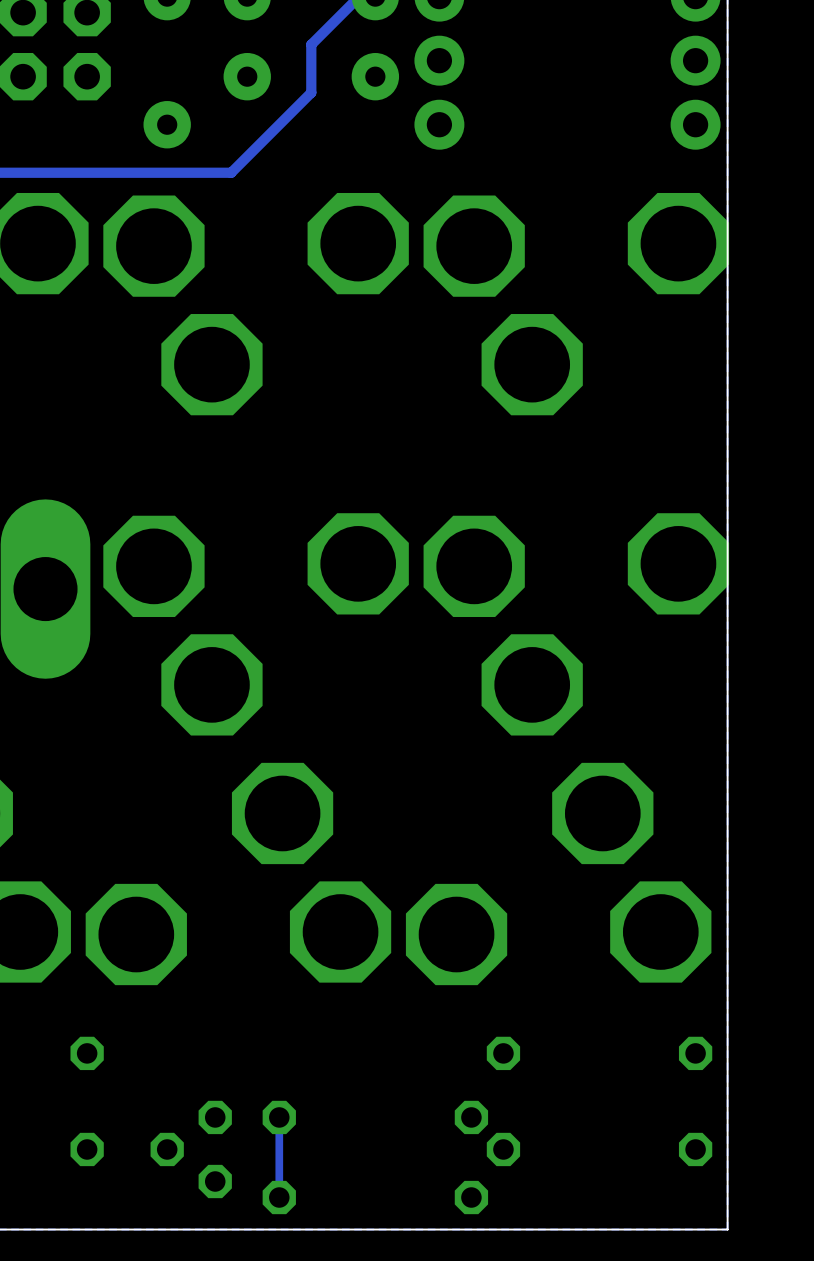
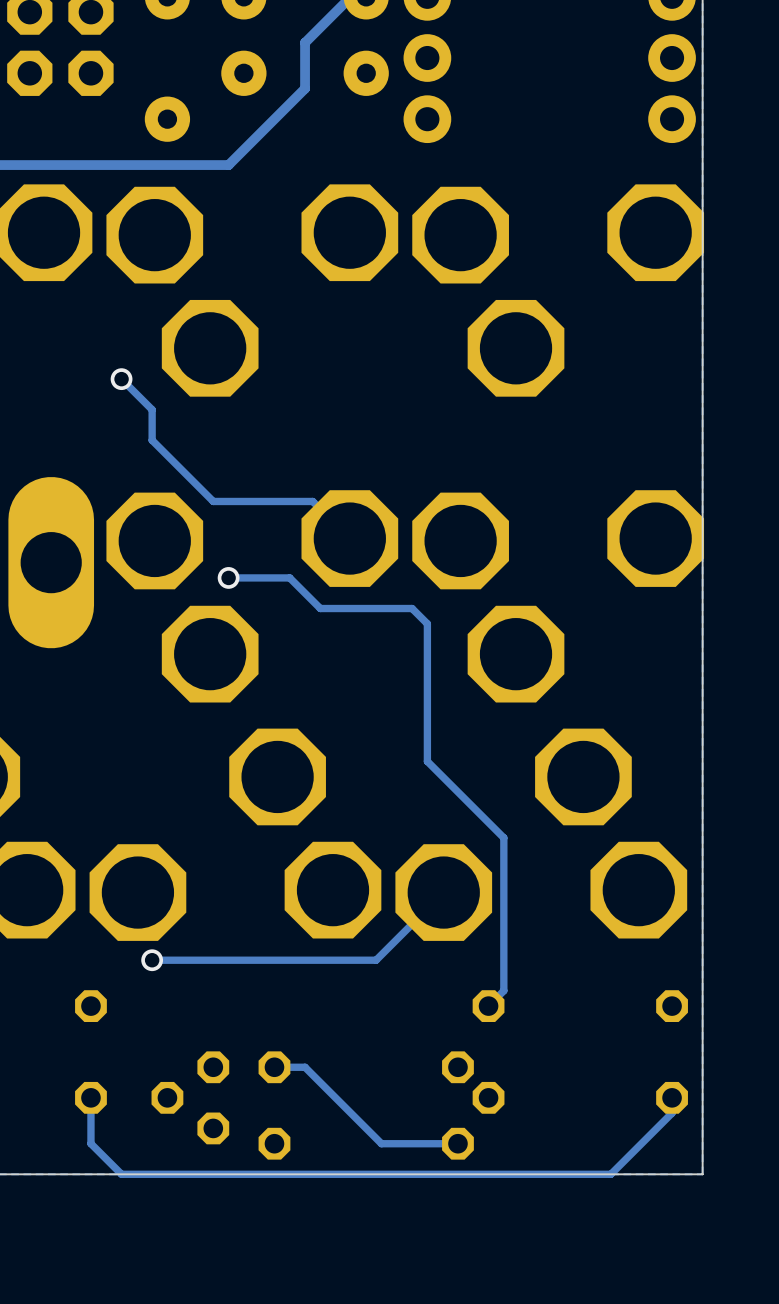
track: none -> (121, 379) (152, 409) (152, 440) (213, 501) (312, 501) (349, 538)
via: none -> (121, 379)
track: none -> (228, 577) (289, 577) (320, 608) (412, 608) (427, 623) (427, 761) (503, 837) (503, 990) (488, 1006)
via: none -> (228, 577)
track: none -> (443, 892) (376, 960) (152, 960)
via: none -> (152, 960)
track: (279, 1117) (279, 1197) -> (274, 1067) (305, 1067) (381, 1143) (457, 1143)
track: none -> (672, 1097) (672, 1113) (610, 1174) (121, 1174) (90, 1143) (90, 1097)

